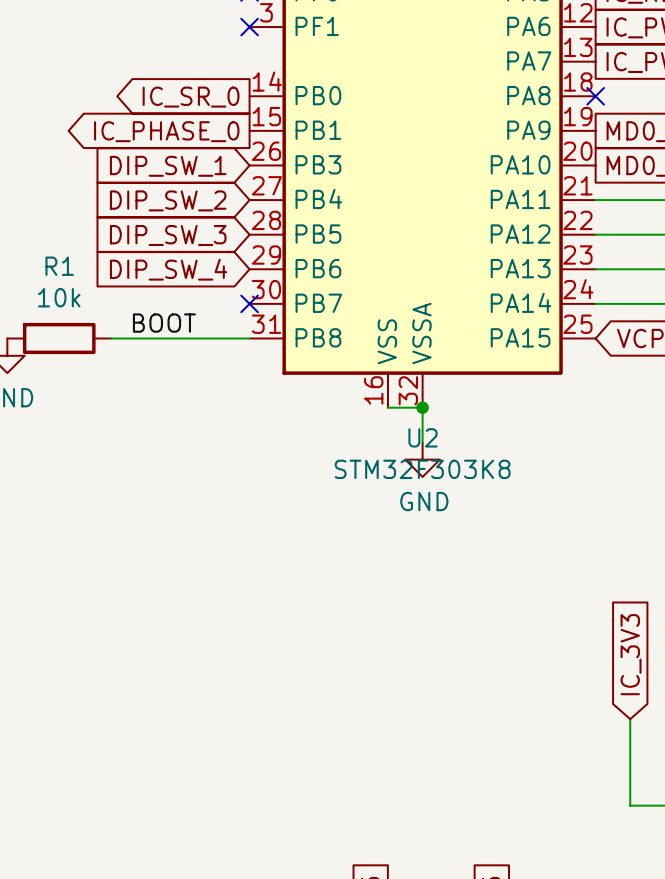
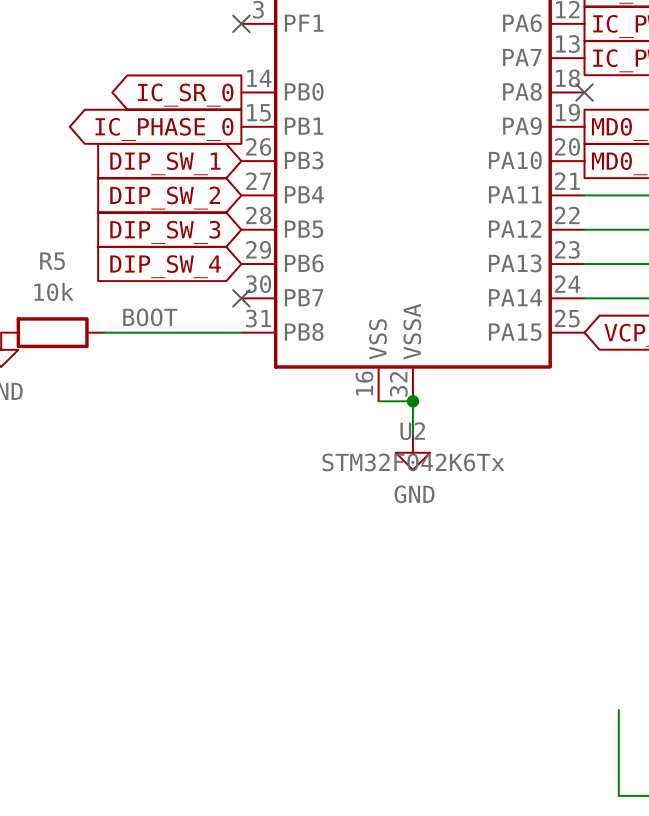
R1 name: R1 (59, 266) -> R5 (52, 261)
U2 value: STM32F303K8 (422, 469) -> STM32F042K6Tx (413, 462)
global label: IC_3V3 (631, 654) -> none

